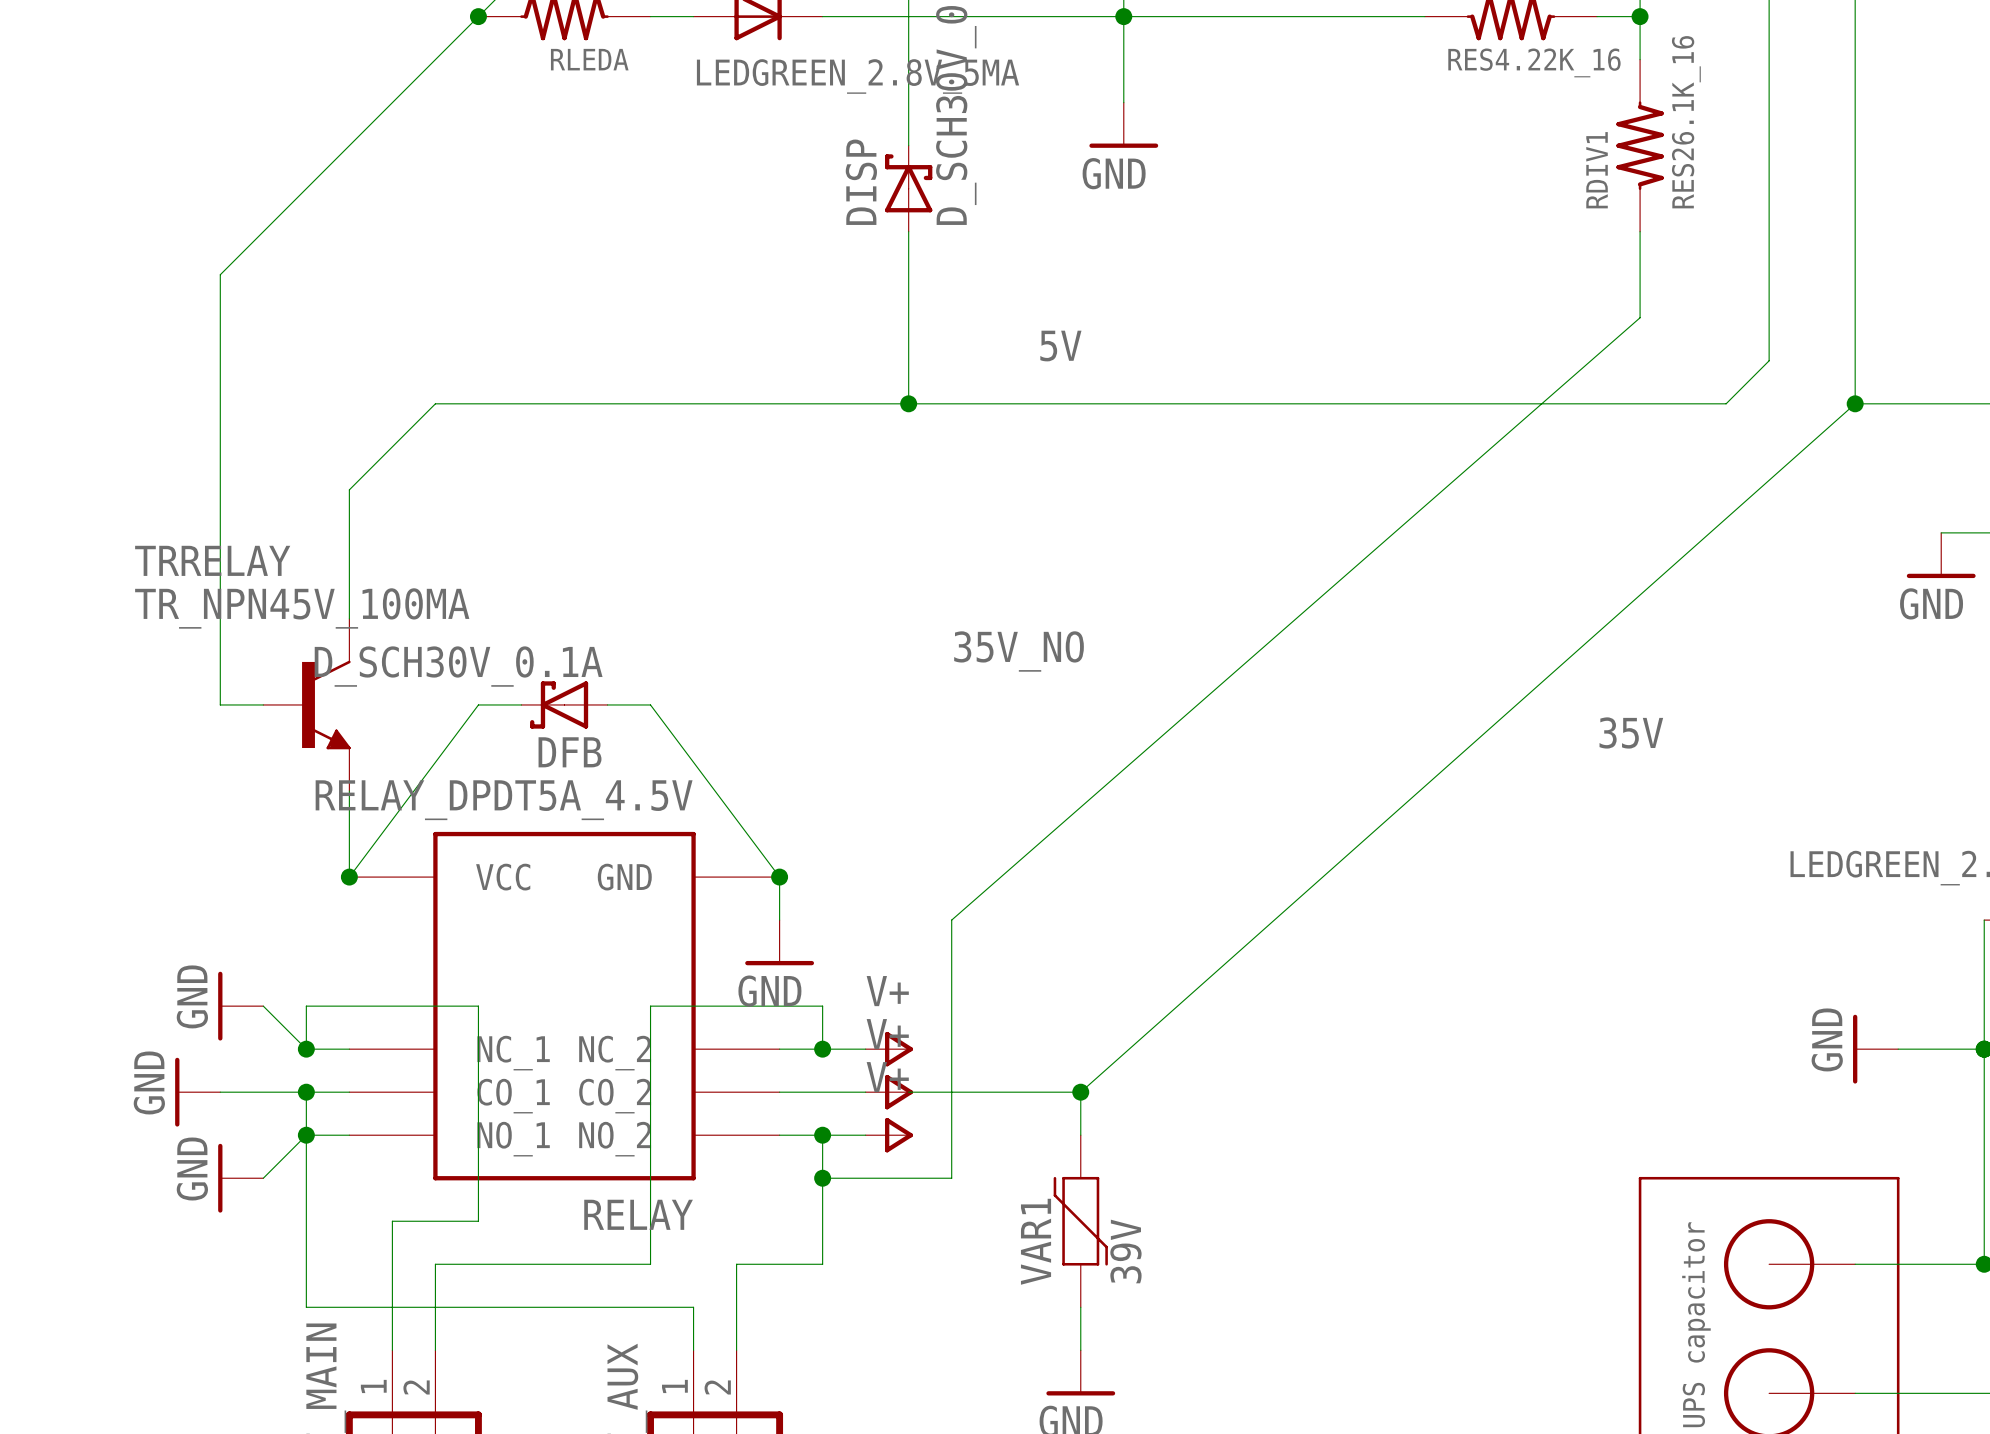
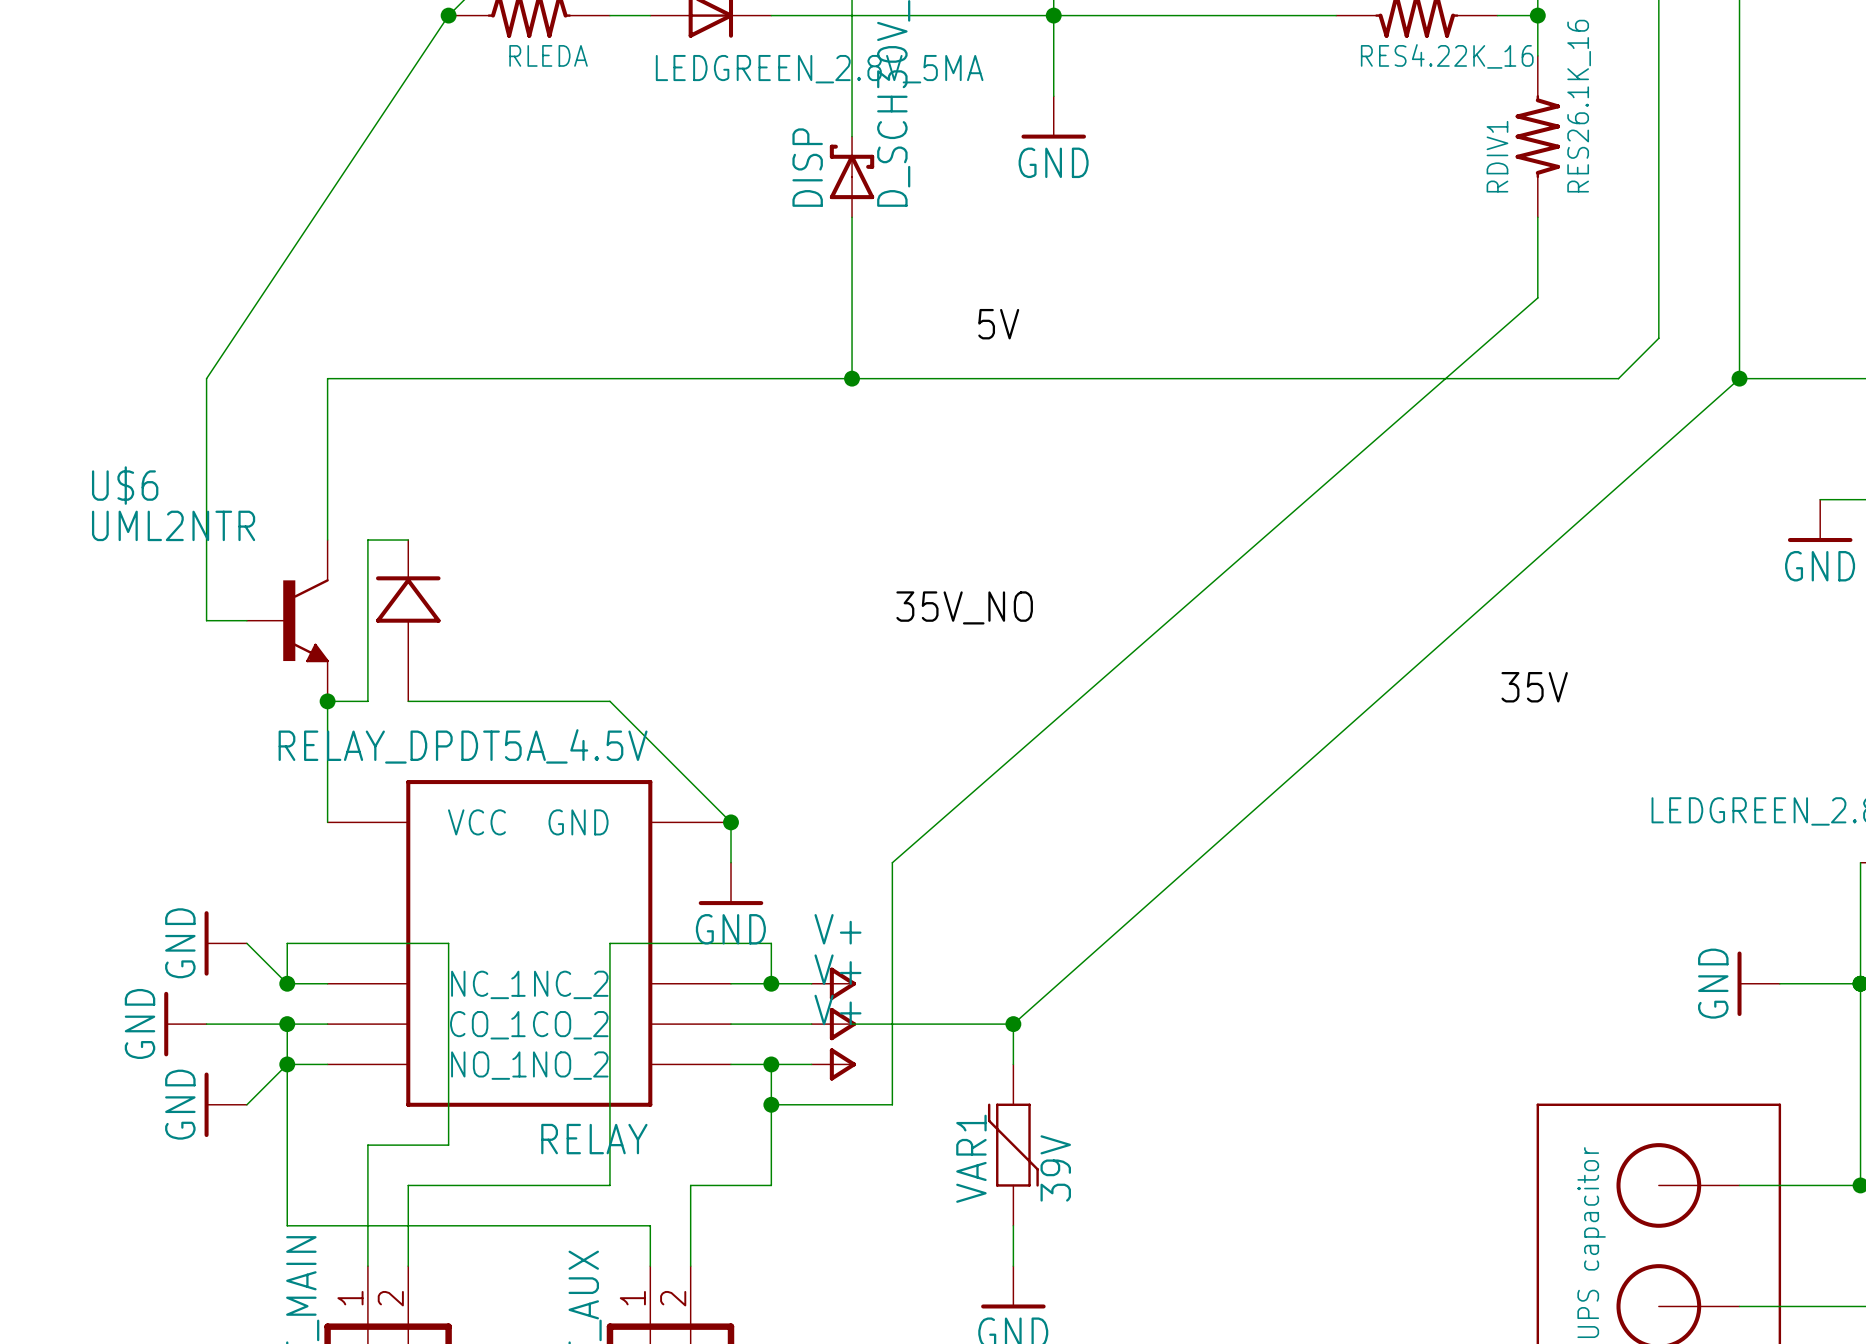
wire: (478, 16) (220, 274) (220, 403) -> (448, 15) (206, 378)
wire: (435, 403) (349, 489) -> (408, 378) (327, 378) (327, 459)
wire: none -> (408, 540) (367, 540) (367, 701) (327, 701) (327, 741)
wire: (220, 661) (220, 704) (263, 704) -> (206, 620) (246, 620)
U$6: none -> UML2NTR (343, 620)
TRRELAY: TR_NPN45V_100MA (307, 704) -> none
wire: (521, 704) (478, 704) (349, 877) -> none
DFB: D_SCH30V_0.1A (564, 704) -> none
wire: (607, 704) (650, 704) (779, 877) -> (408, 701) (609, 701) (731, 822)
junction: none -> (327, 701)
junction: (349, 877) -> none

